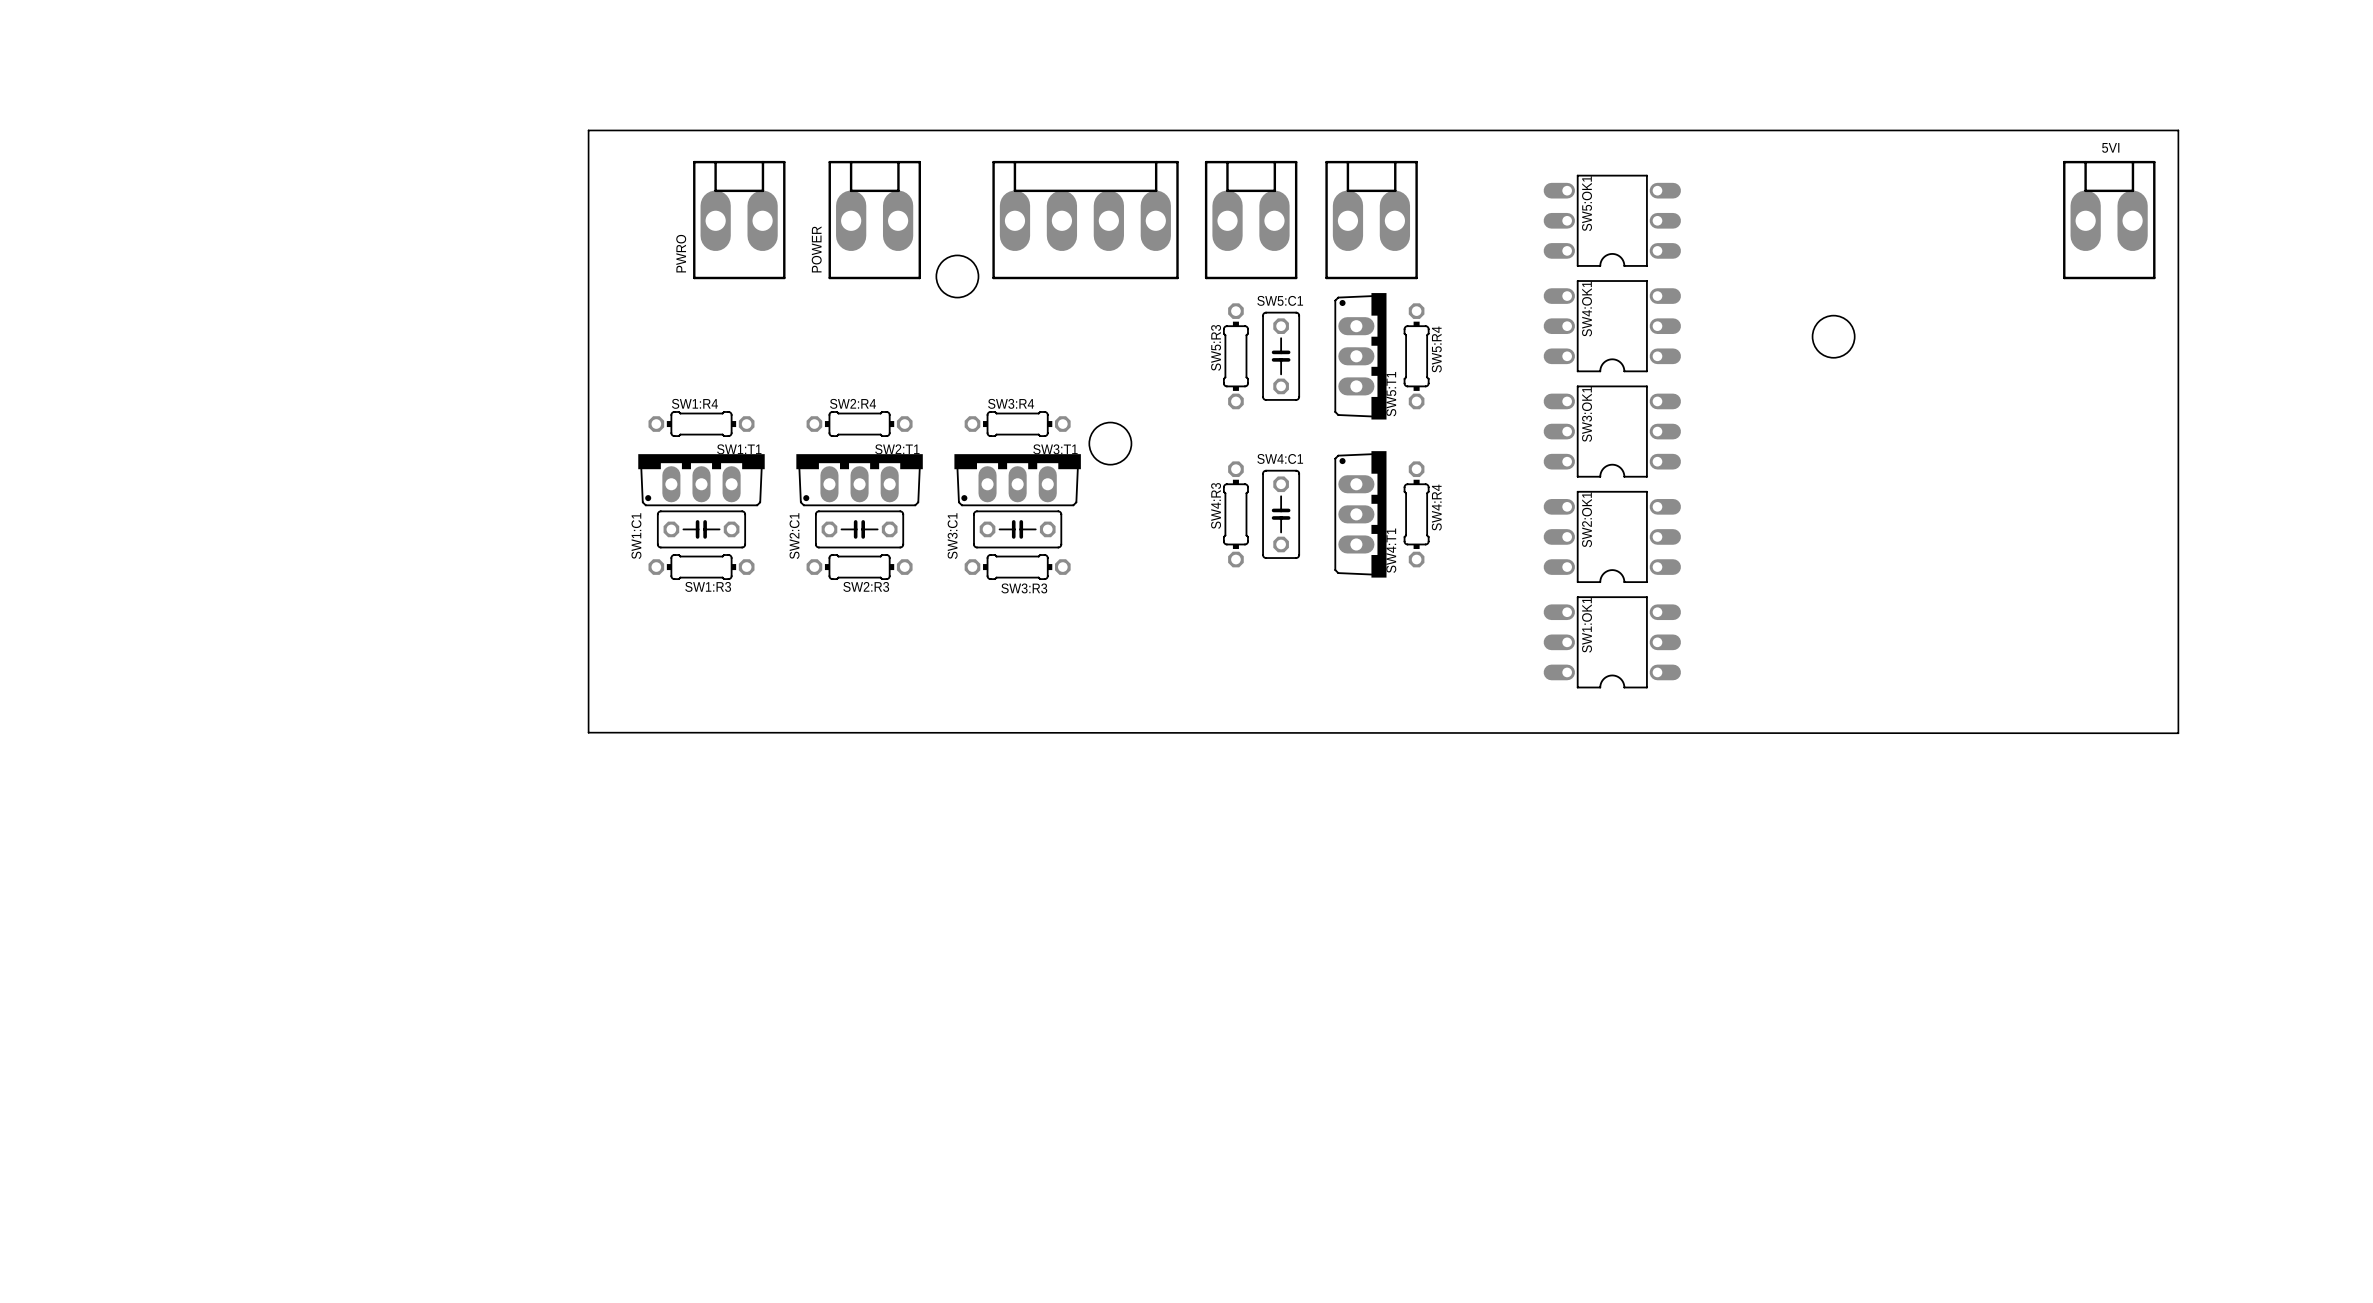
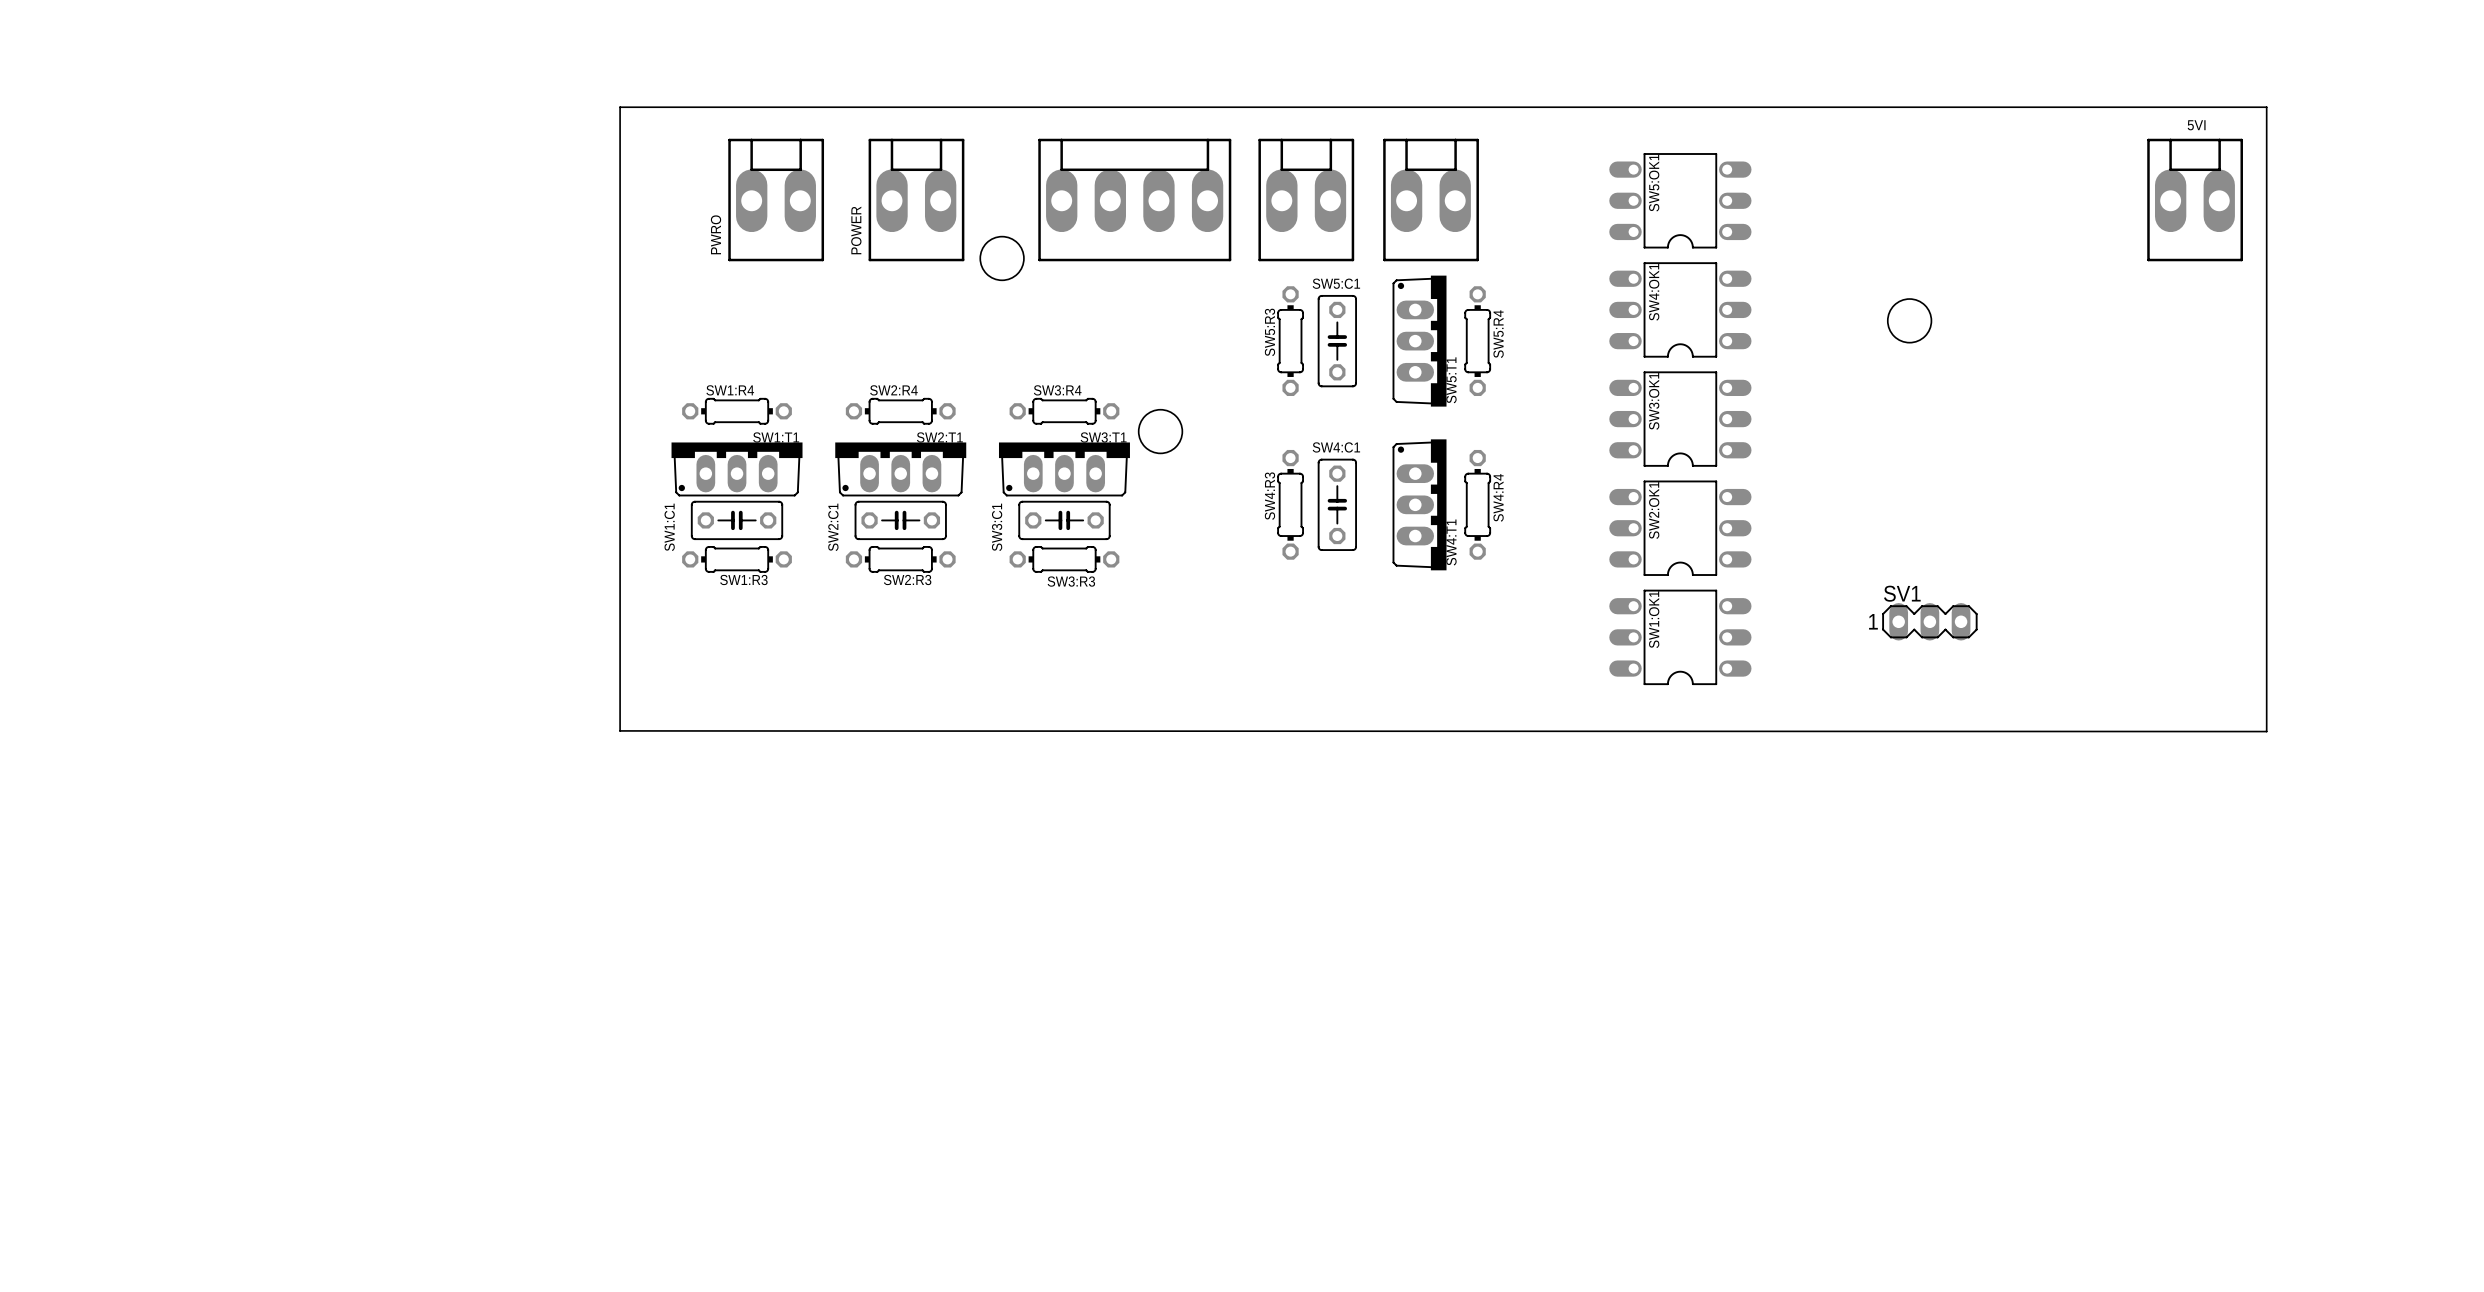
SV1: none -> (1929, 621)

